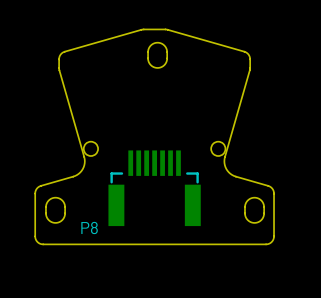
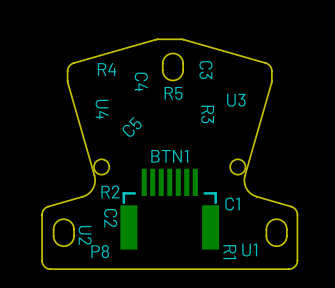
R4: none -> (107, 69)
C3: none -> (205, 70)
C4: none -> (141, 81)
R5: none -> (173, 93)
U3: none -> (236, 100)
U4: none -> (102, 109)
R3: none -> (207, 114)
C5: none -> (132, 126)
BTN1: none -> (169, 156)
R2: none -> (110, 191)
C1: none -> (232, 203)
C2: none -> (110, 218)
U2: none -> (85, 235)
U1: none -> (249, 250)
R1: none -> (229, 252)

